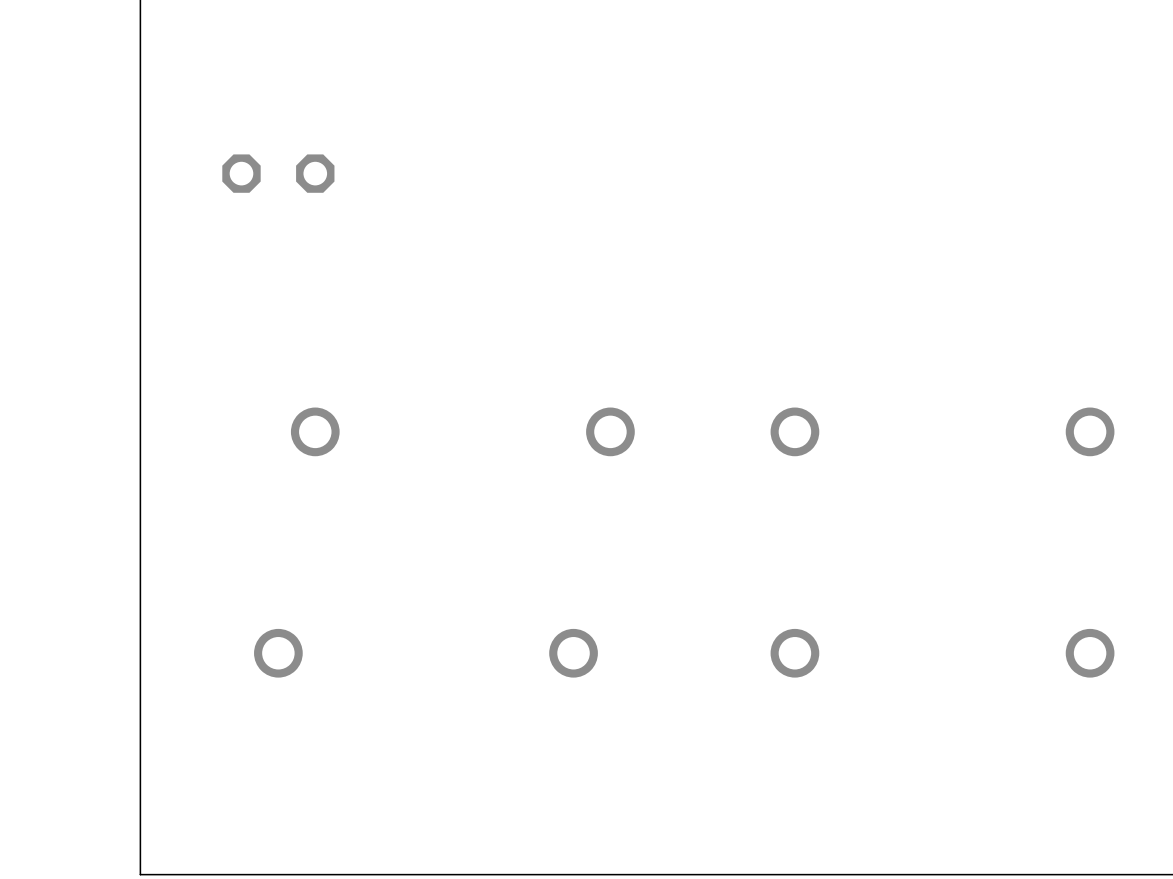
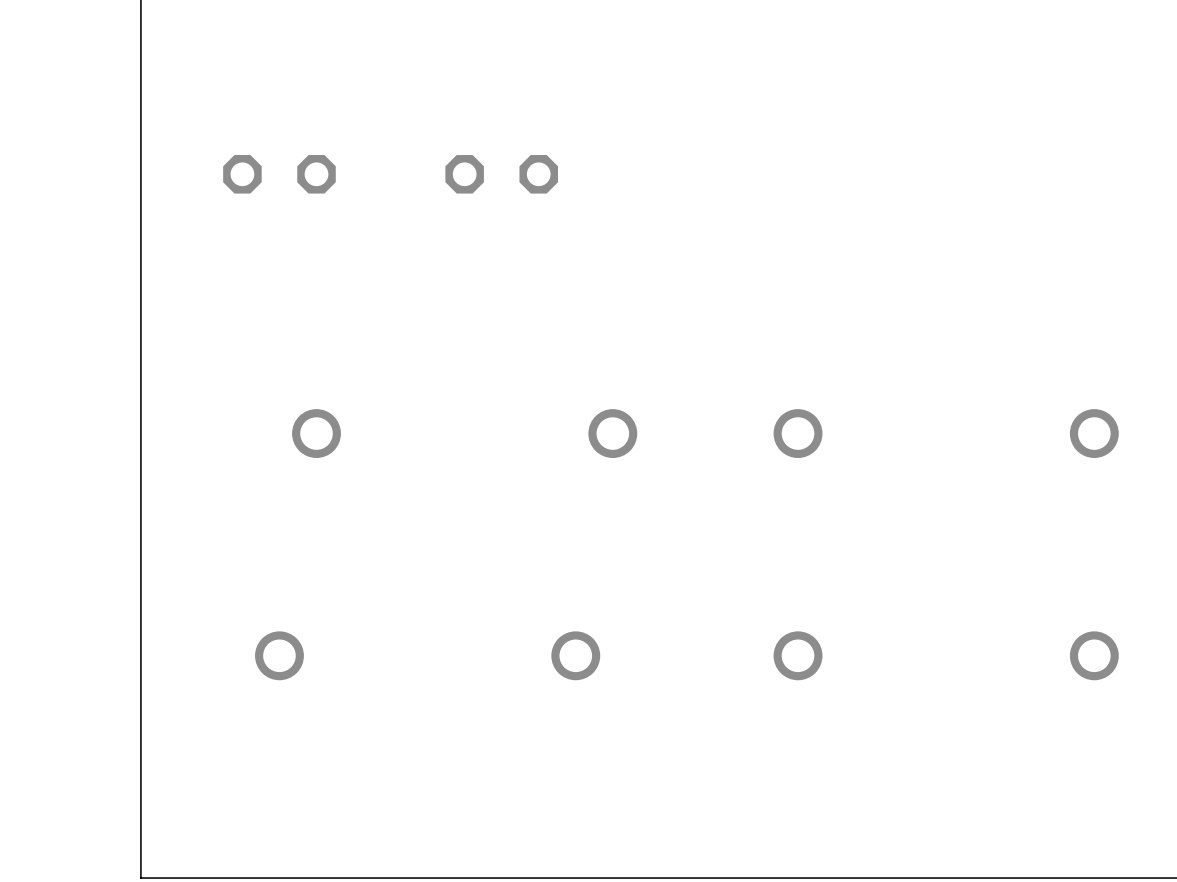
part: none -> (501, 174)

